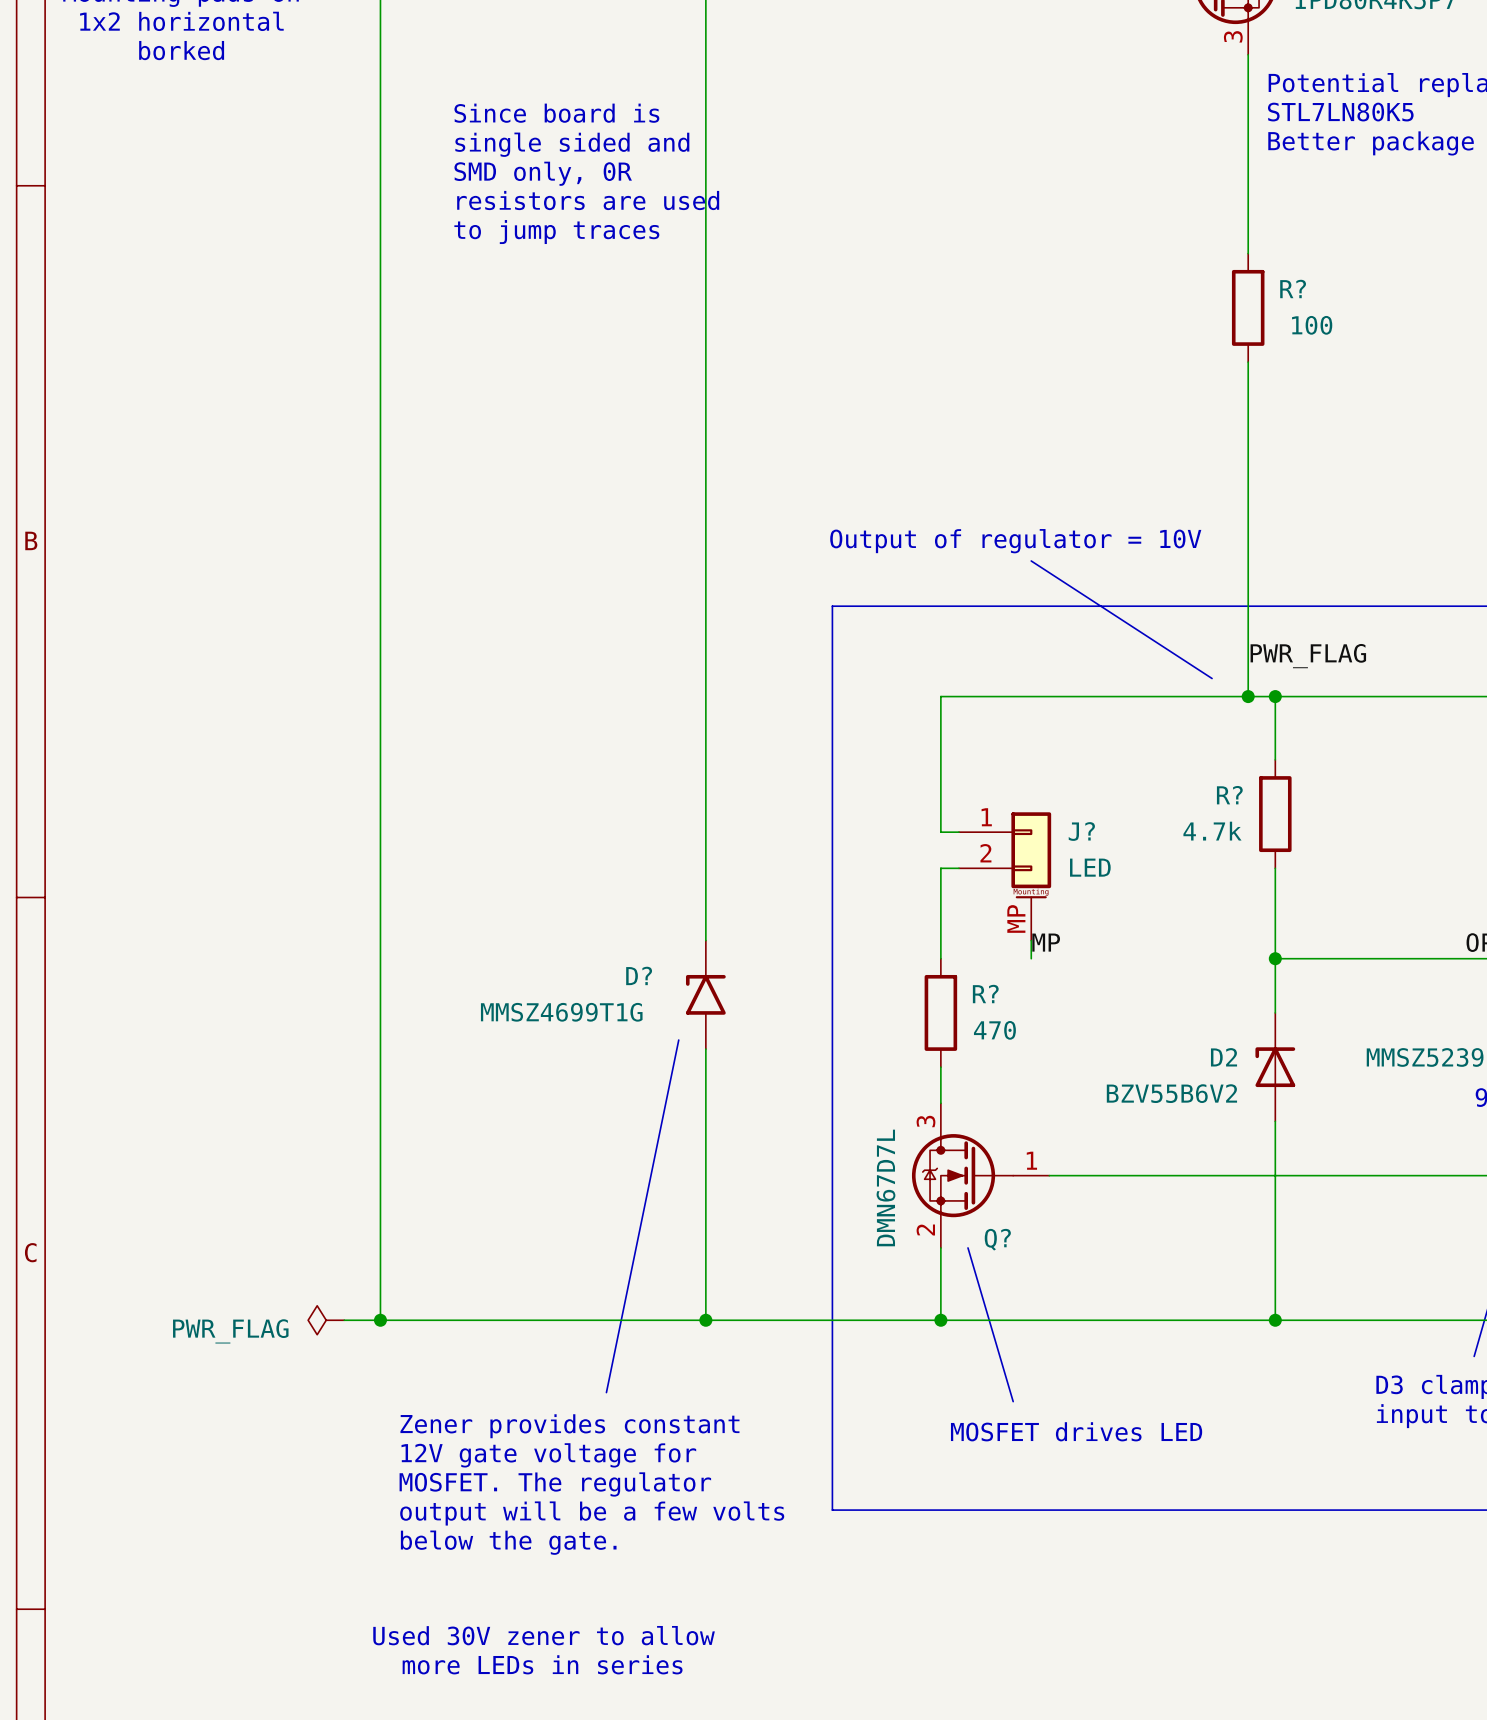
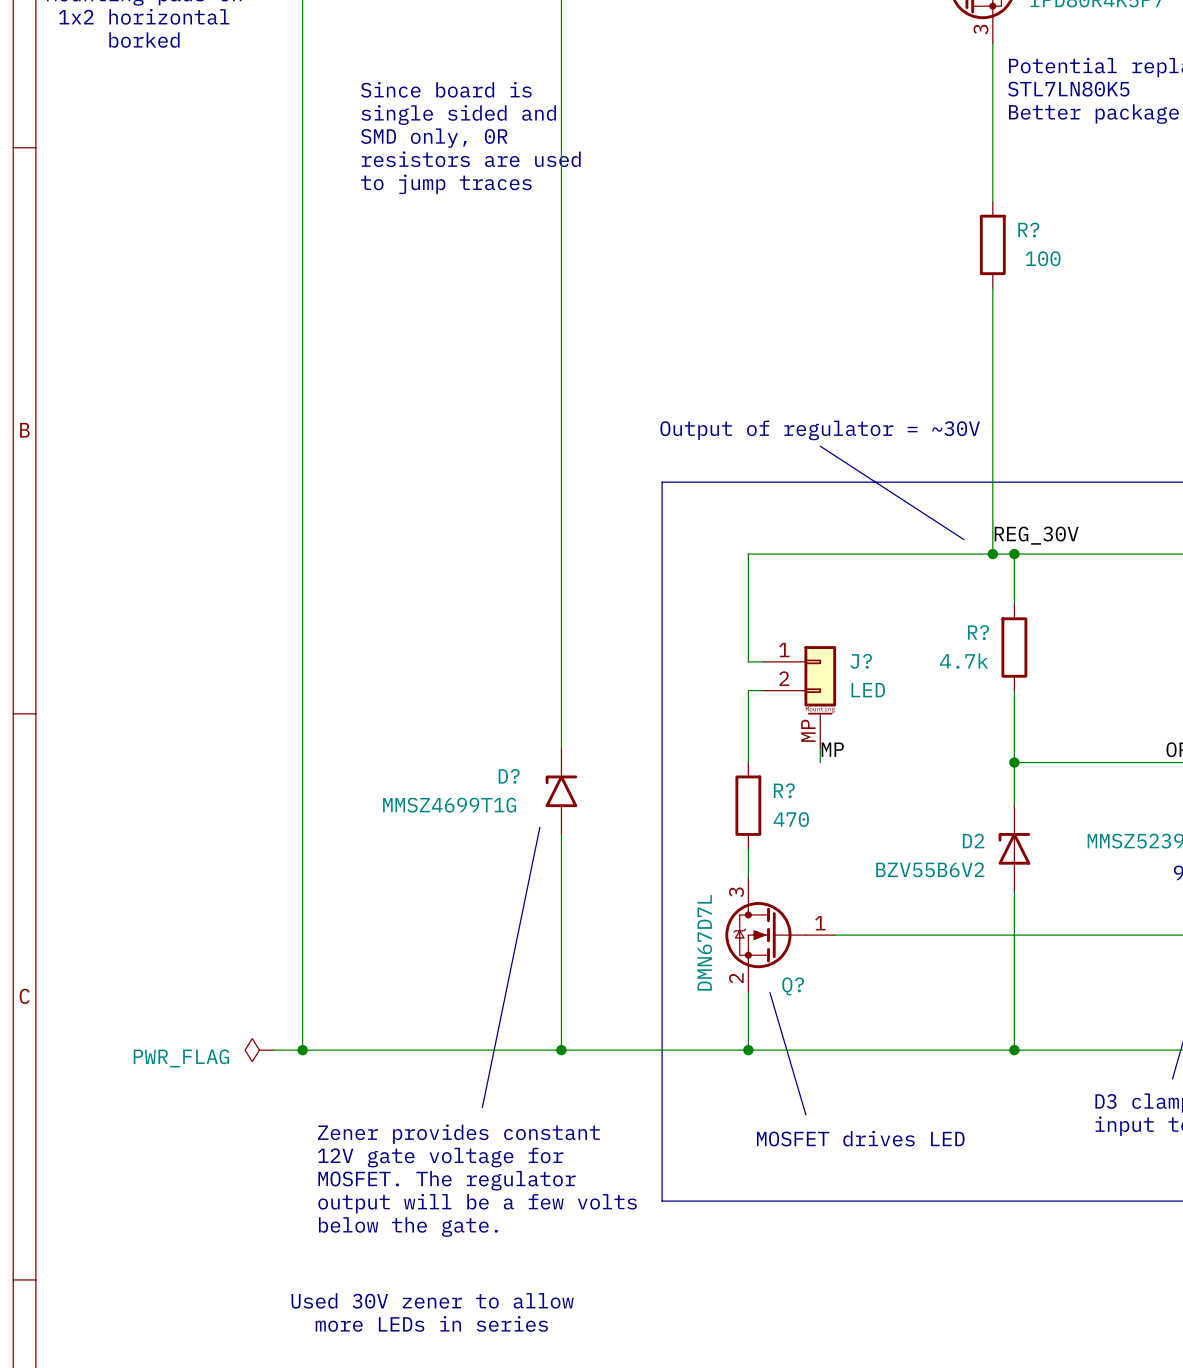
text: Output of regulator = 10V (1015, 541) -> Output of regulator = ~30V (820, 430)
label: PWR_FLAG (1308, 656) -> none
label: none -> REG_30V (1036, 535)

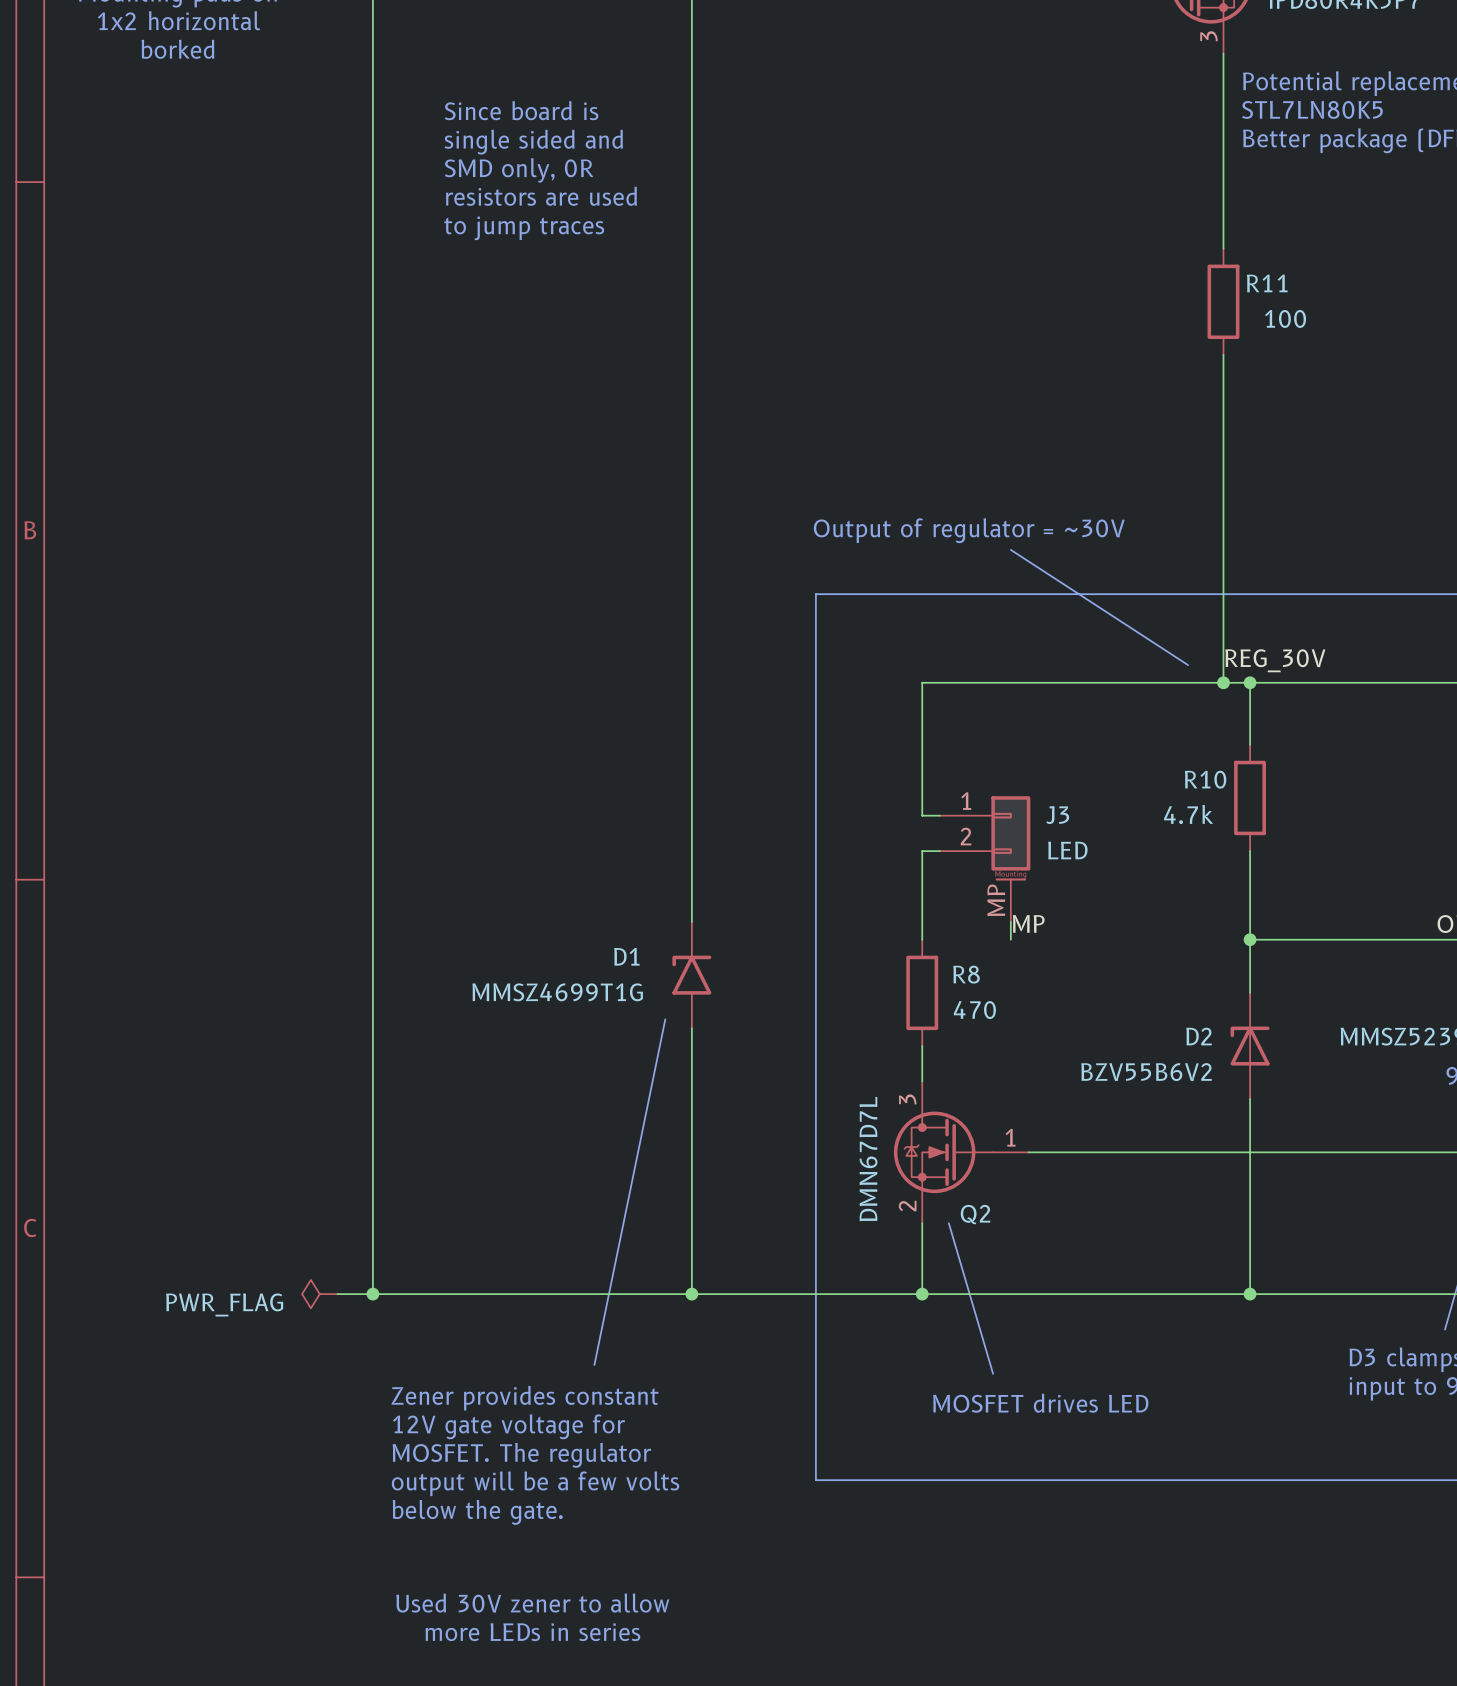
R? name: R? (1028, 229) -> R11 (1267, 283)
R? name: R? (978, 632) -> R10 (1205, 779)
J? name: J? (861, 661) -> J3 (1057, 815)
D? name: D? (509, 776) -> D1 (626, 956)
R? name: R? (784, 790) -> R8 (966, 974)
Q? name: Q? (793, 986) -> Q2 (975, 1214)

